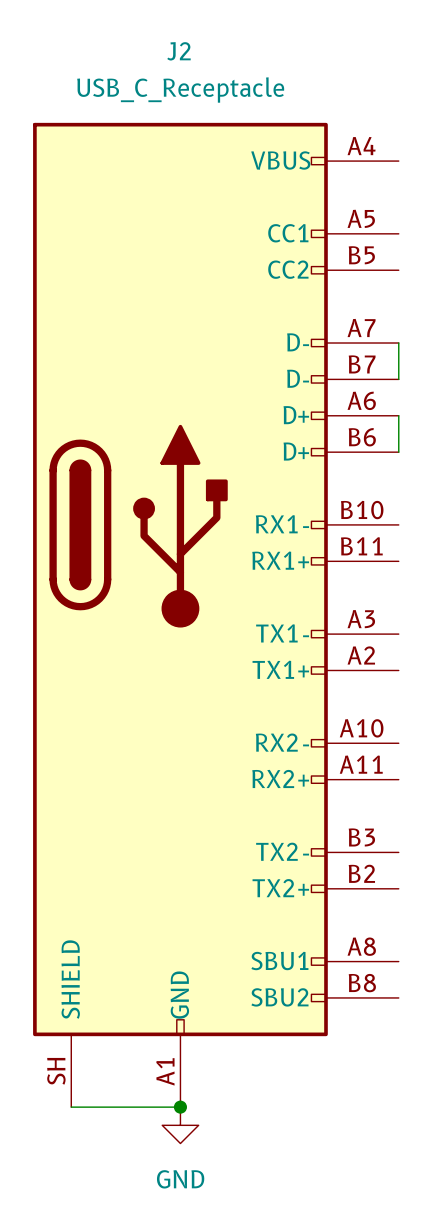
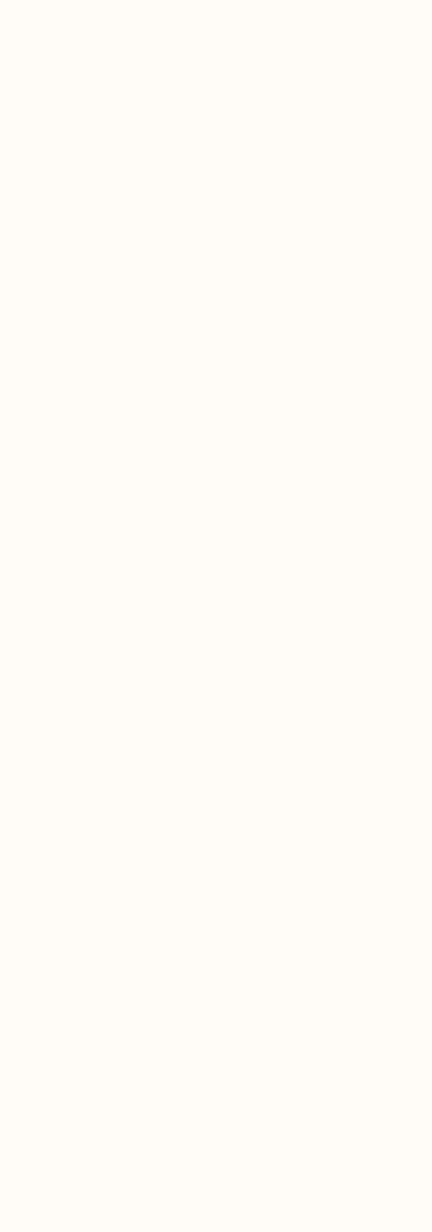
wire: (398, 343) (398, 379) -> none
wire: (398, 415) (398, 452) -> none
J2: USB_C_Receptacle (215, 614) -> none
wire: (71, 1107) (180, 1107) -> none
junction: (180, 1107) -> none
power symbol: GND (180, 1125) -> none

